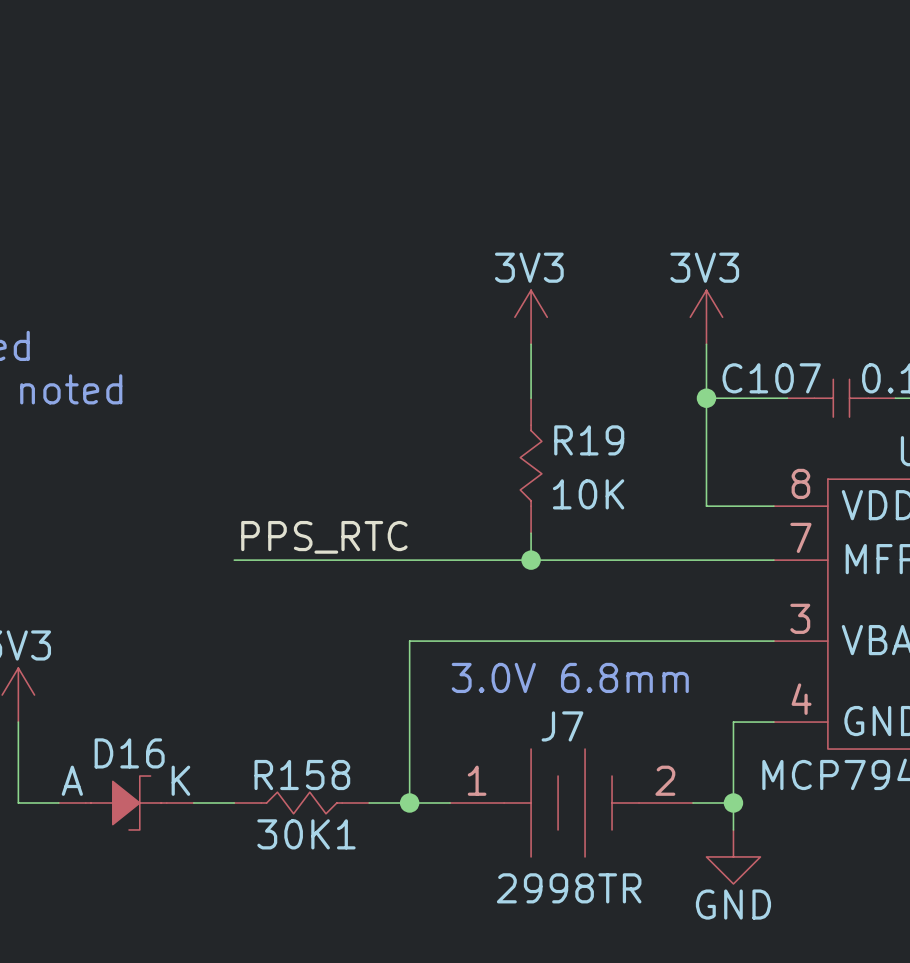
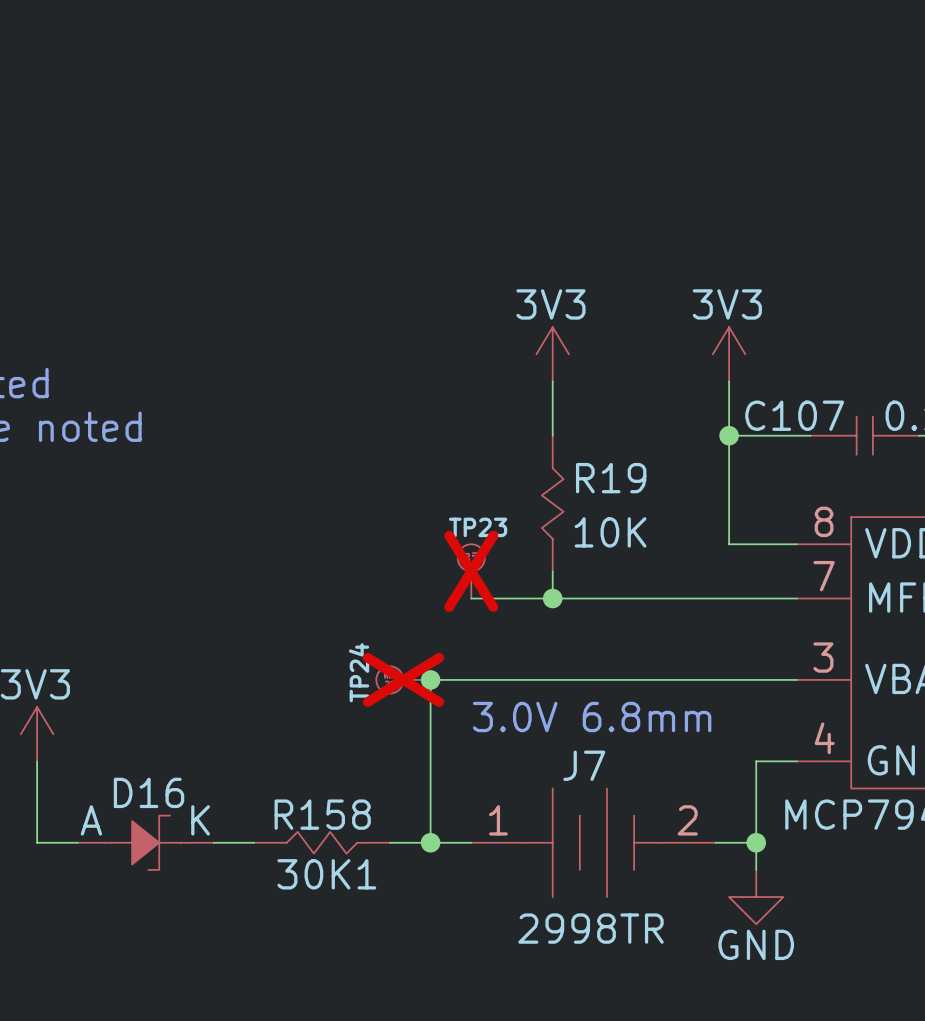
TP23: none -> (471, 571)
label: PPS_RTC (324, 537) -> none
wire: (234, 560) (450, 560) -> none
TP24: none -> (403, 679)
junction: none -> (430, 679)

